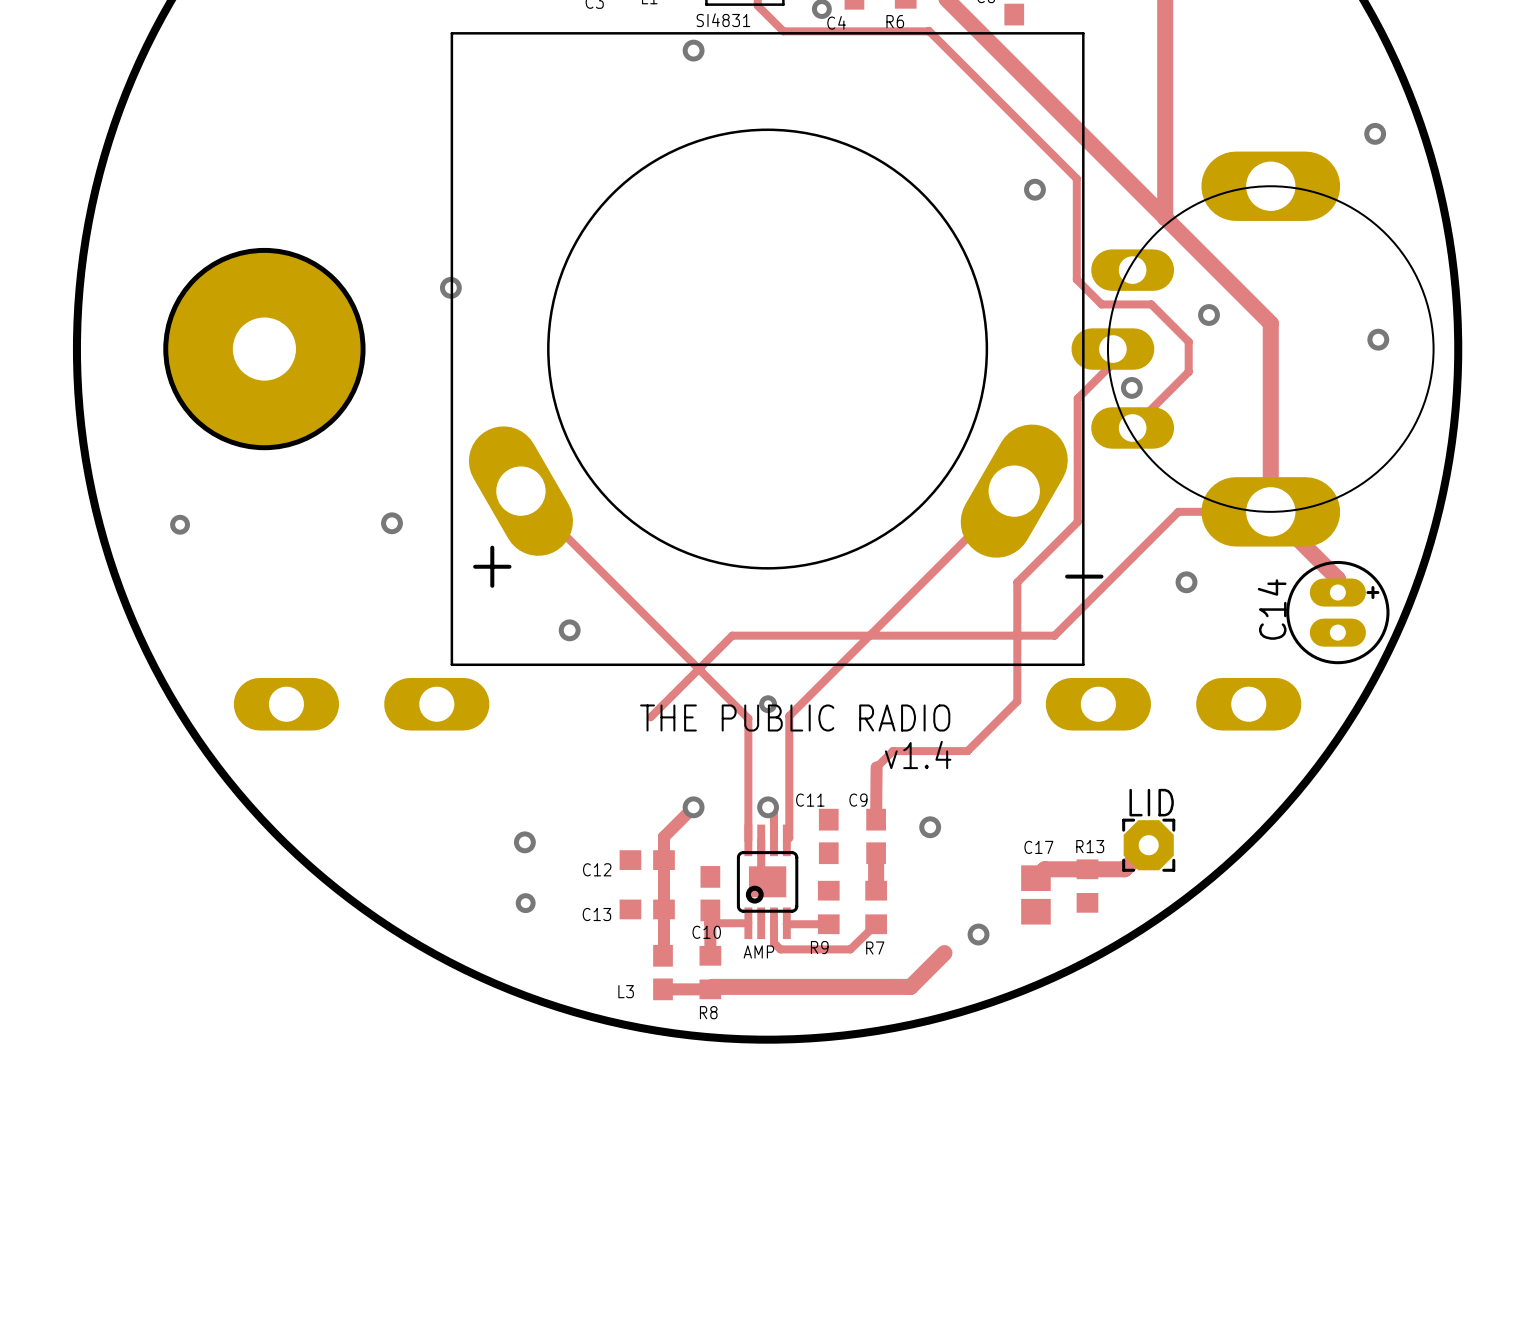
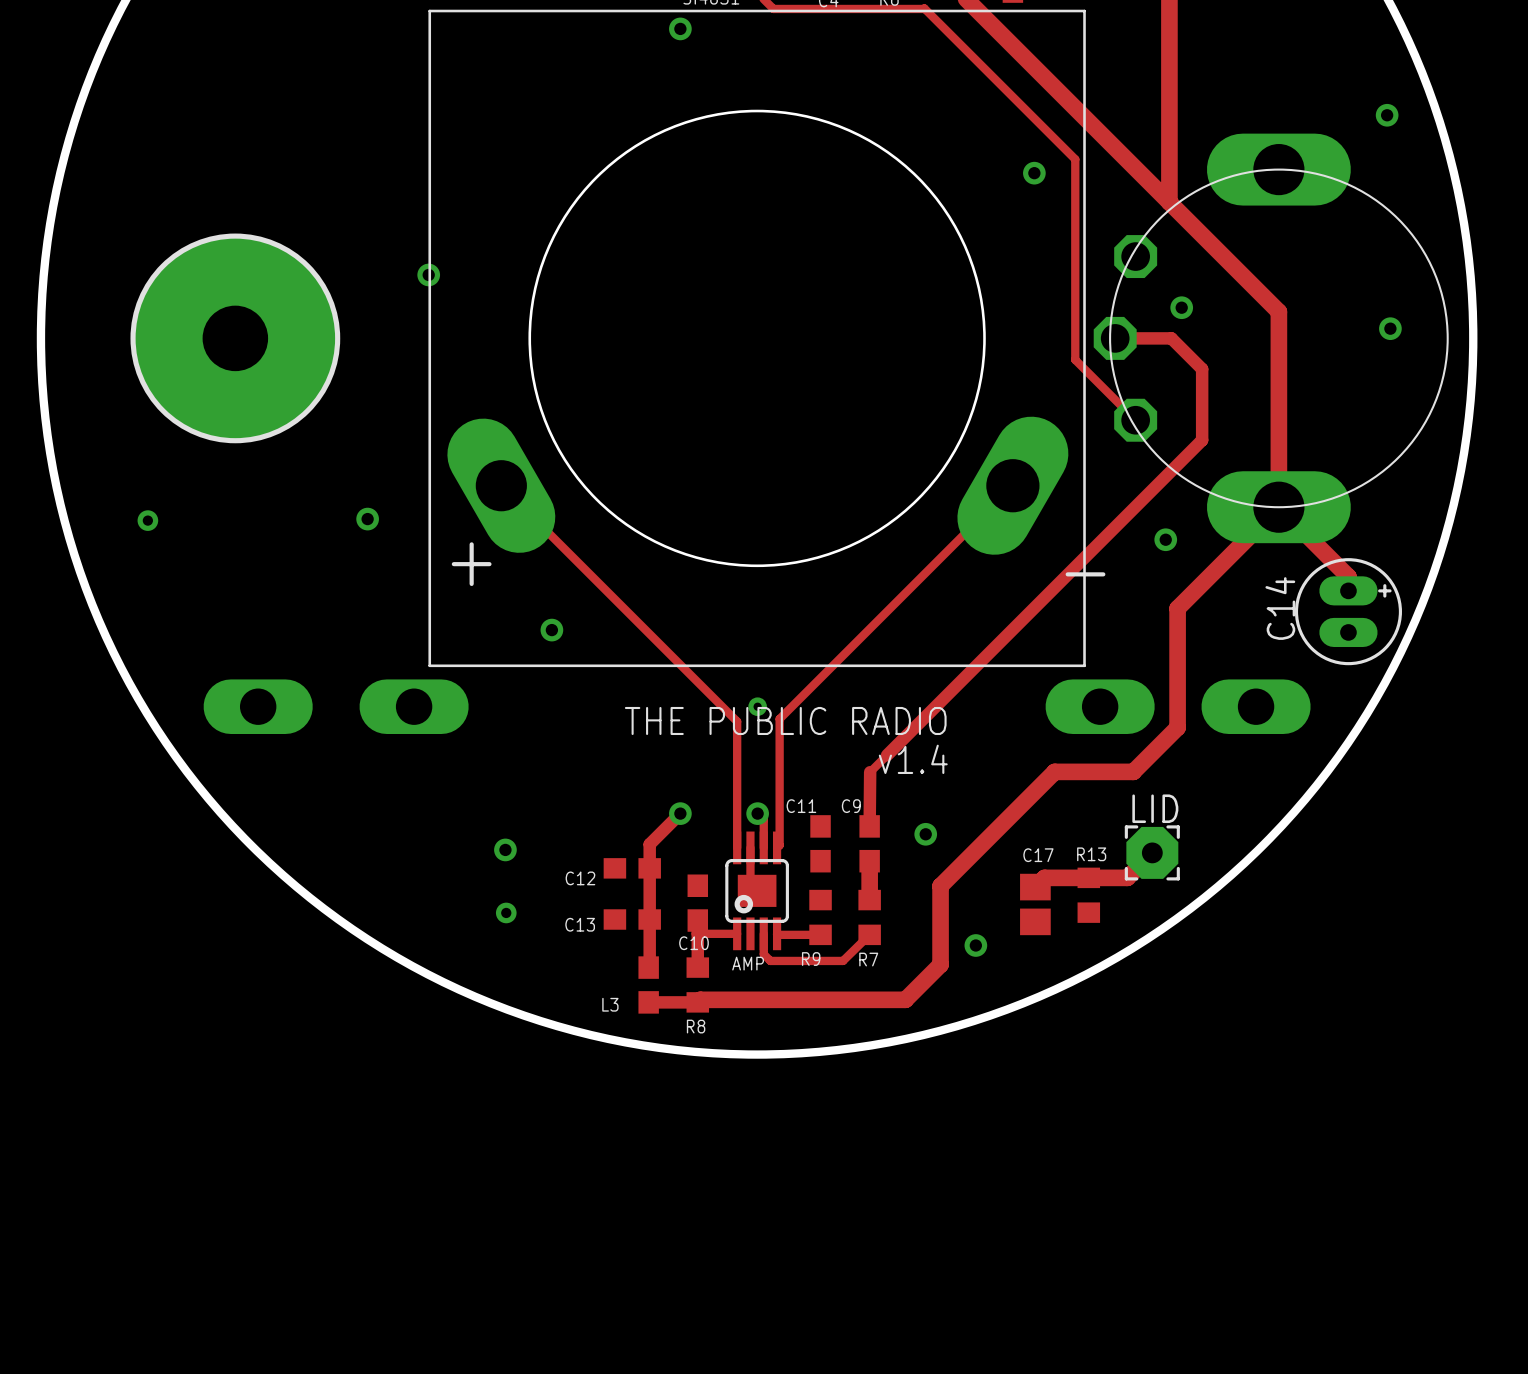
part footprint: [1071, 151, 1435, 547] -> [1093, 133, 1449, 544]
track: (1074, 176) (1076, 178) (1076, 279) (1101, 304) (1151, 304) (1188, 341) (1188, 371) (1132, 427) -> (1075, 159) (1075, 359) (1135, 420)
via position: (1209, 315) -> (1181, 307)
track: (1112, 349) (1112, 363) (1077, 398) (1077, 522) (1017, 582) (1017, 701) (967, 751) (892, 751) -> (1115, 338) (1171, 338) (1202, 369) (1202, 440) (887, 755)
via: (1131, 387) -> none
track: (1270, 511) (1178, 511) (1054, 635) (732, 635) (650, 717) -> (1278, 507) (1177, 608) (1177, 727) (1133, 771) (1054, 771) (940, 886) (940, 964)
via position: (1186, 582) -> (1165, 539)

